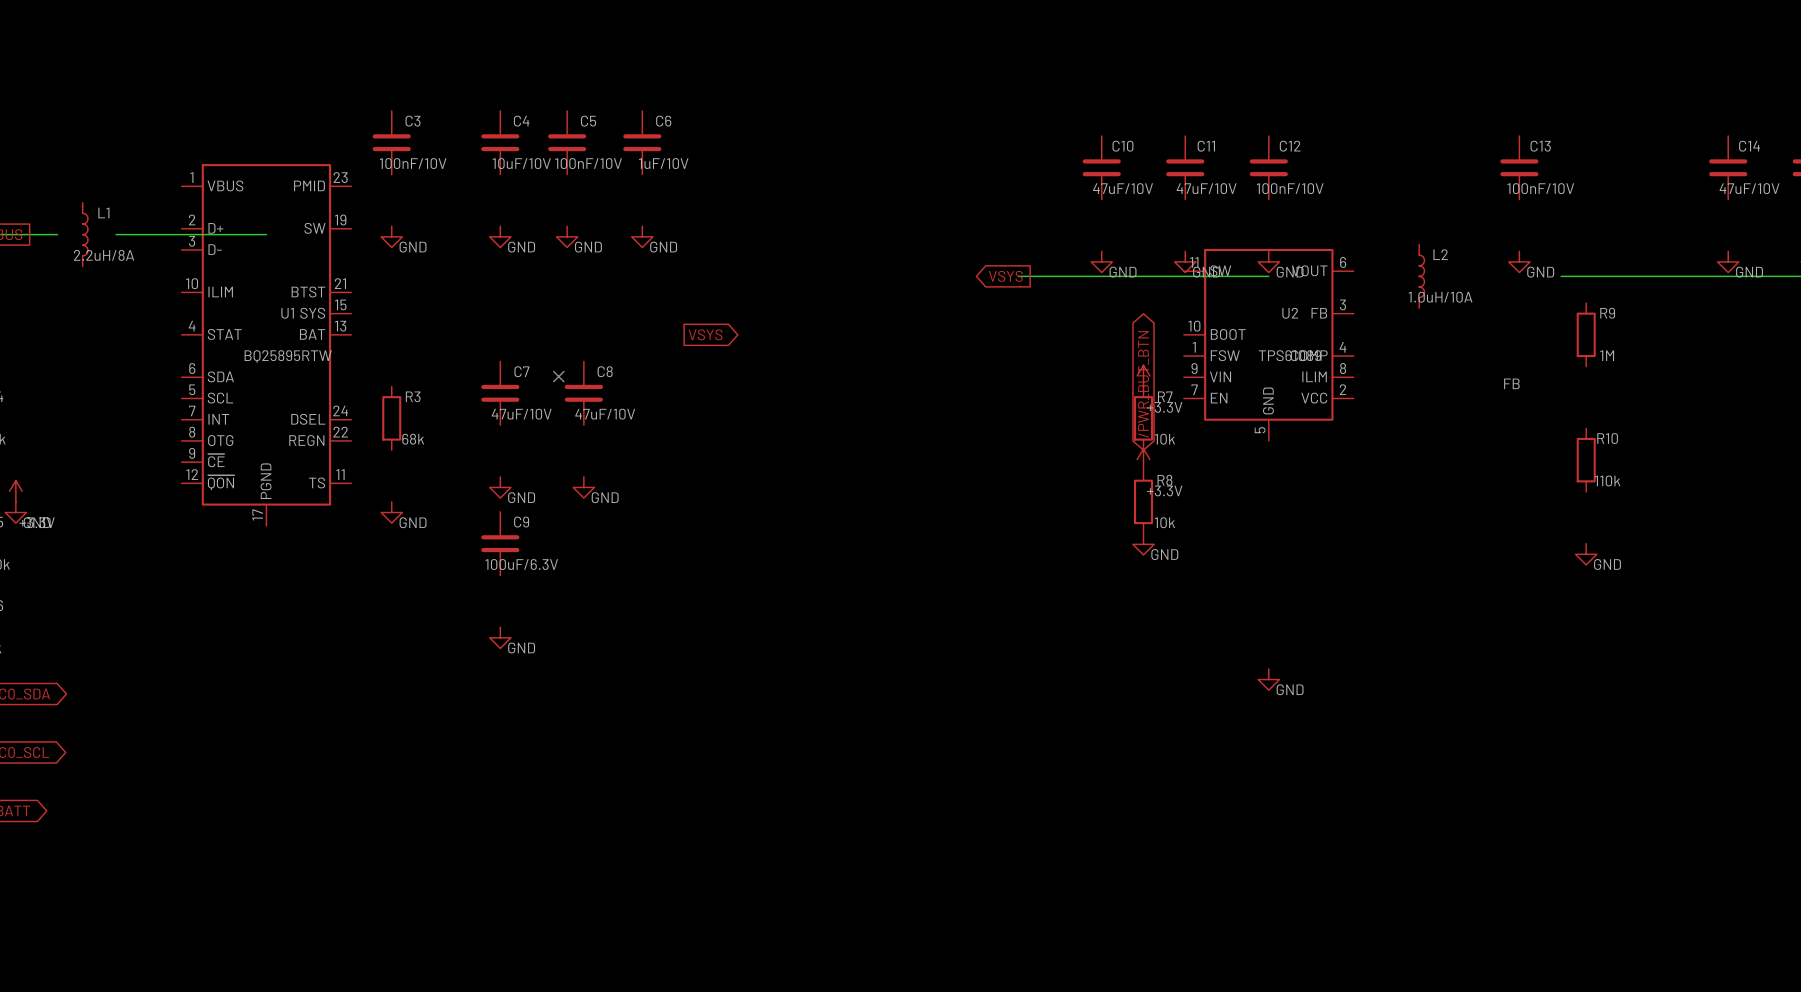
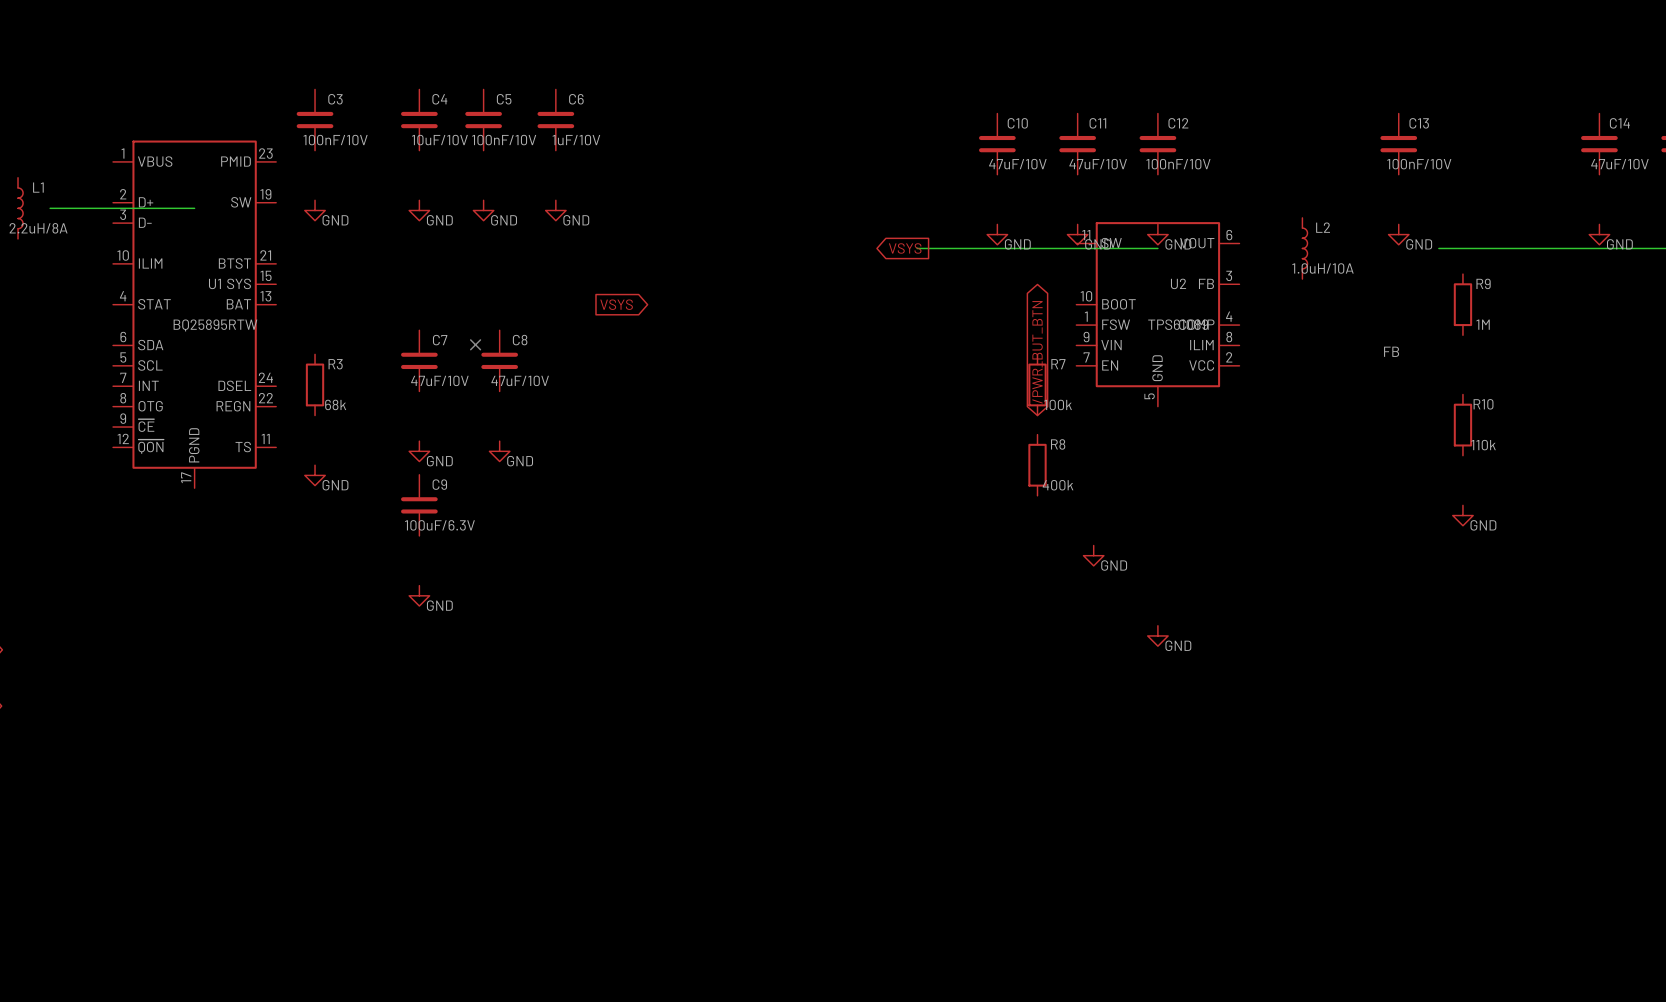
power symbol: +3.3V (1143, 375) -> none
R7 value: 10k (1164, 439) -> 100k (1058, 404)
power symbol: +3.3V (1143, 459) -> none
R8 value: 10k (1164, 522) -> 400k (1058, 485)
power symbol position: GND (1143, 544) -> GND (1093, 555)

